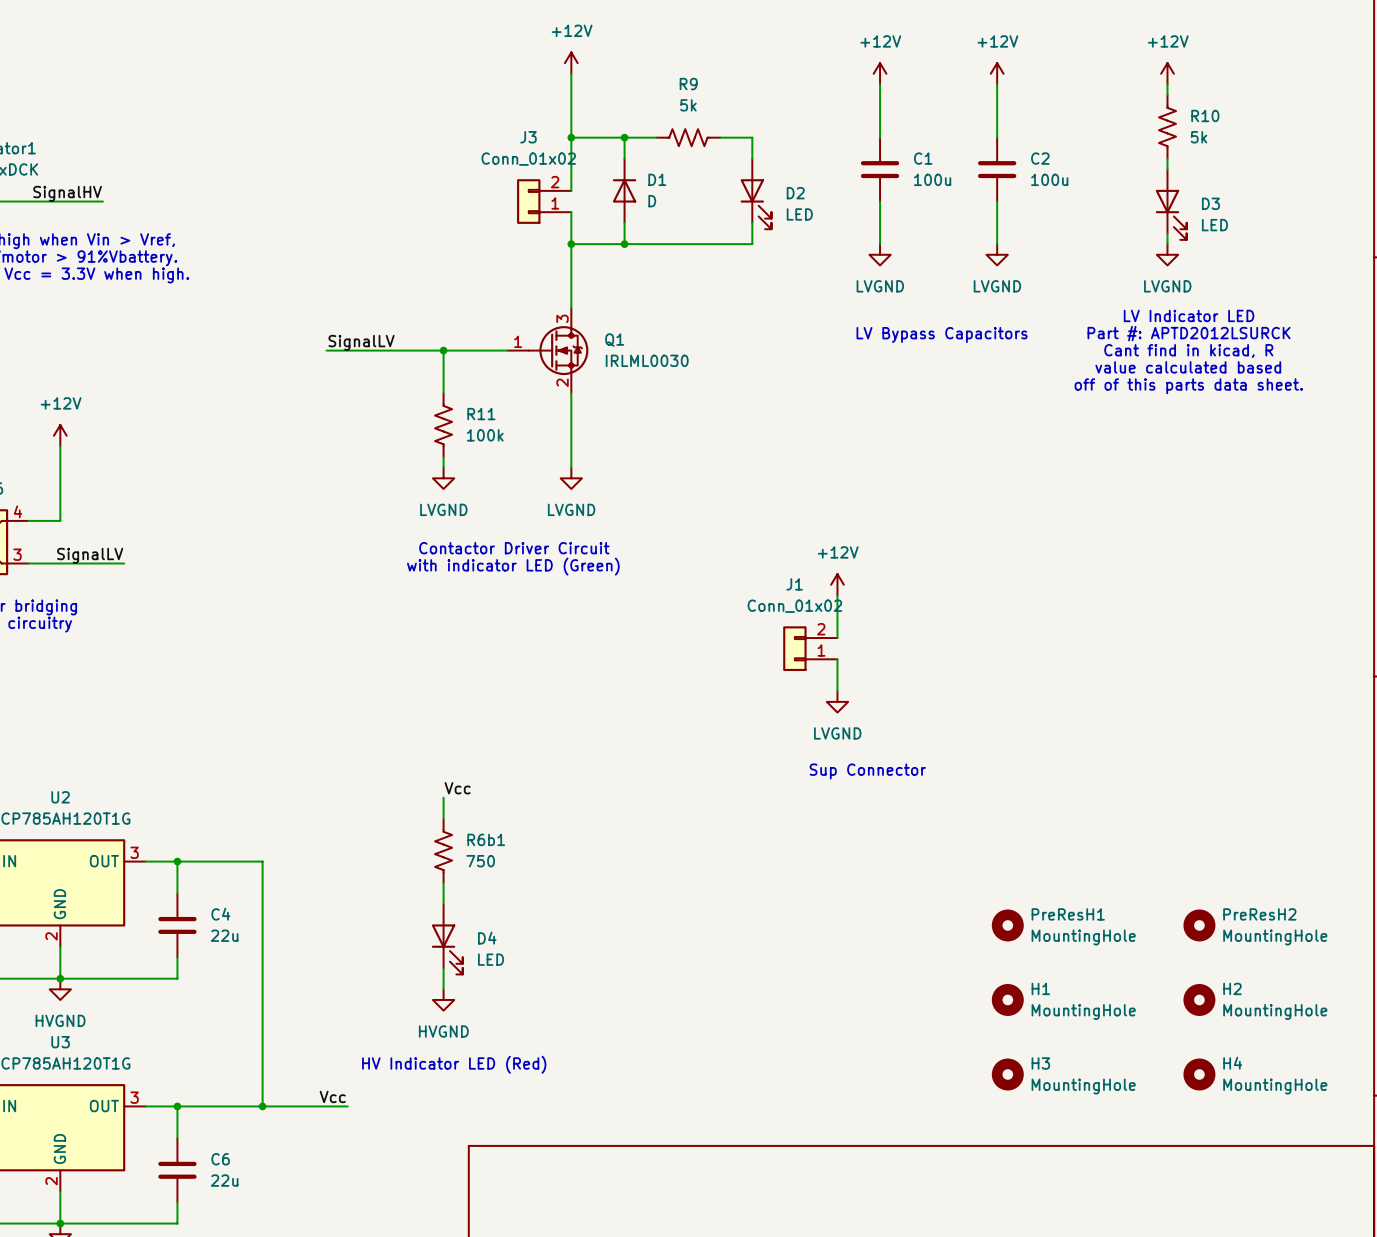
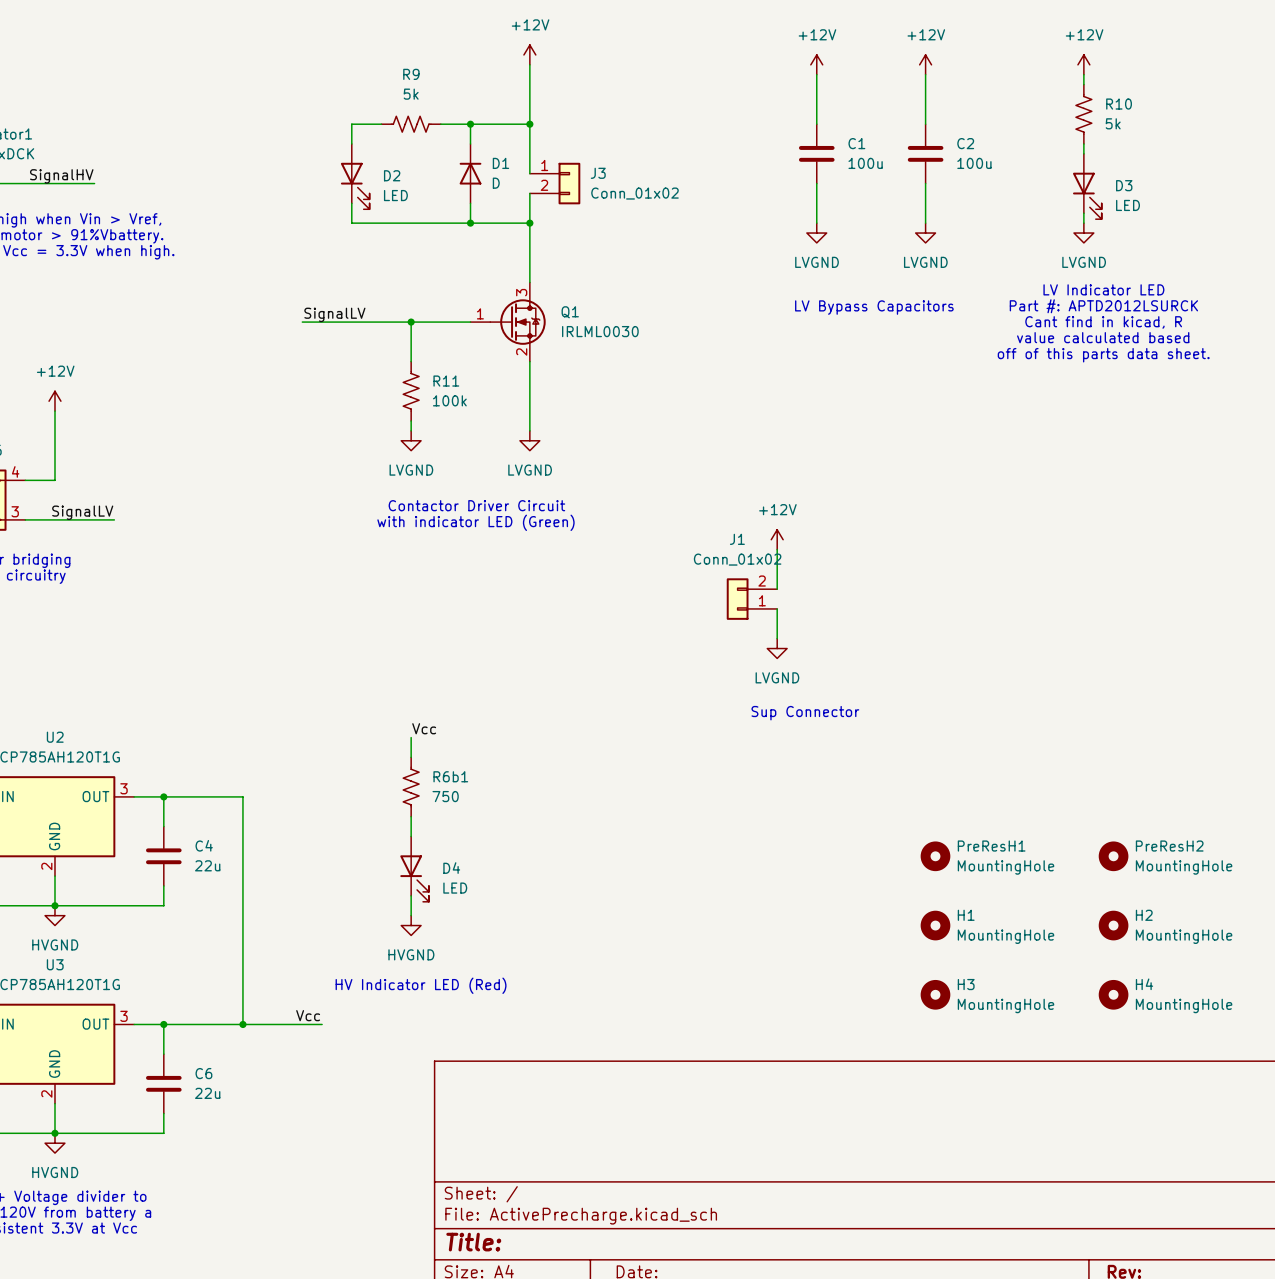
wire: none -> (381, 124) (351, 124) (351, 143)
junction: none -> (470, 124)
J3 name position: J3 (528, 137) -> J3 (598, 173)
wire: (571, 137) (656, 137) -> (529, 124) (440, 124)
wire: (624, 137) (624, 158) -> (470, 124) (470, 143)
junction: (624, 137) -> none
R9 position: (688, 137) -> (411, 124)
wire: (720, 137) (752, 137) (752, 158) -> none
J3 value position: Conn_01x02 (528, 159) -> Conn_01x02 (634, 193)
D1 position: (624, 190) -> (470, 173)
D2 position: (756, 194) -> (355, 176)
J3 rotation: 0° (528, 201) -> 180° (569, 183)
J3 position: (544, 201) -> (555, 183)
wire: (624, 222) (624, 244) -> (470, 203) (470, 223)
wire: (752, 222) (752, 244) (571, 244) -> (351, 203) (351, 223) (529, 223)
junction: none -> (470, 223)
junction: (624, 244) -> none

